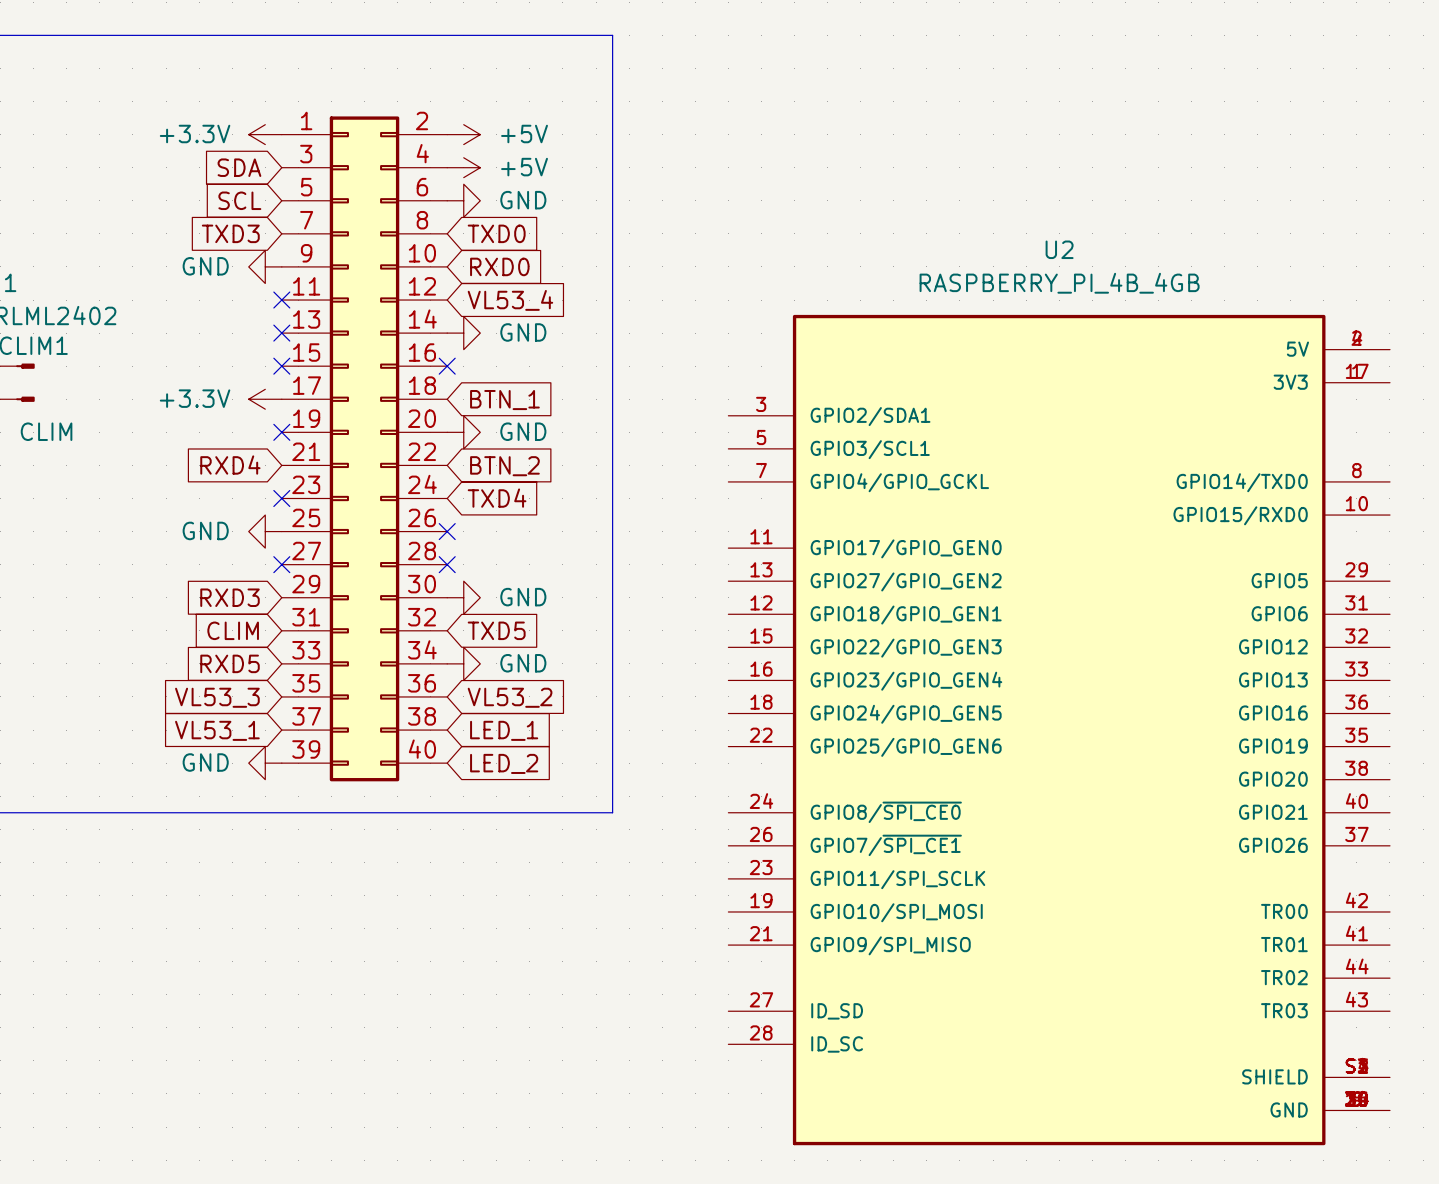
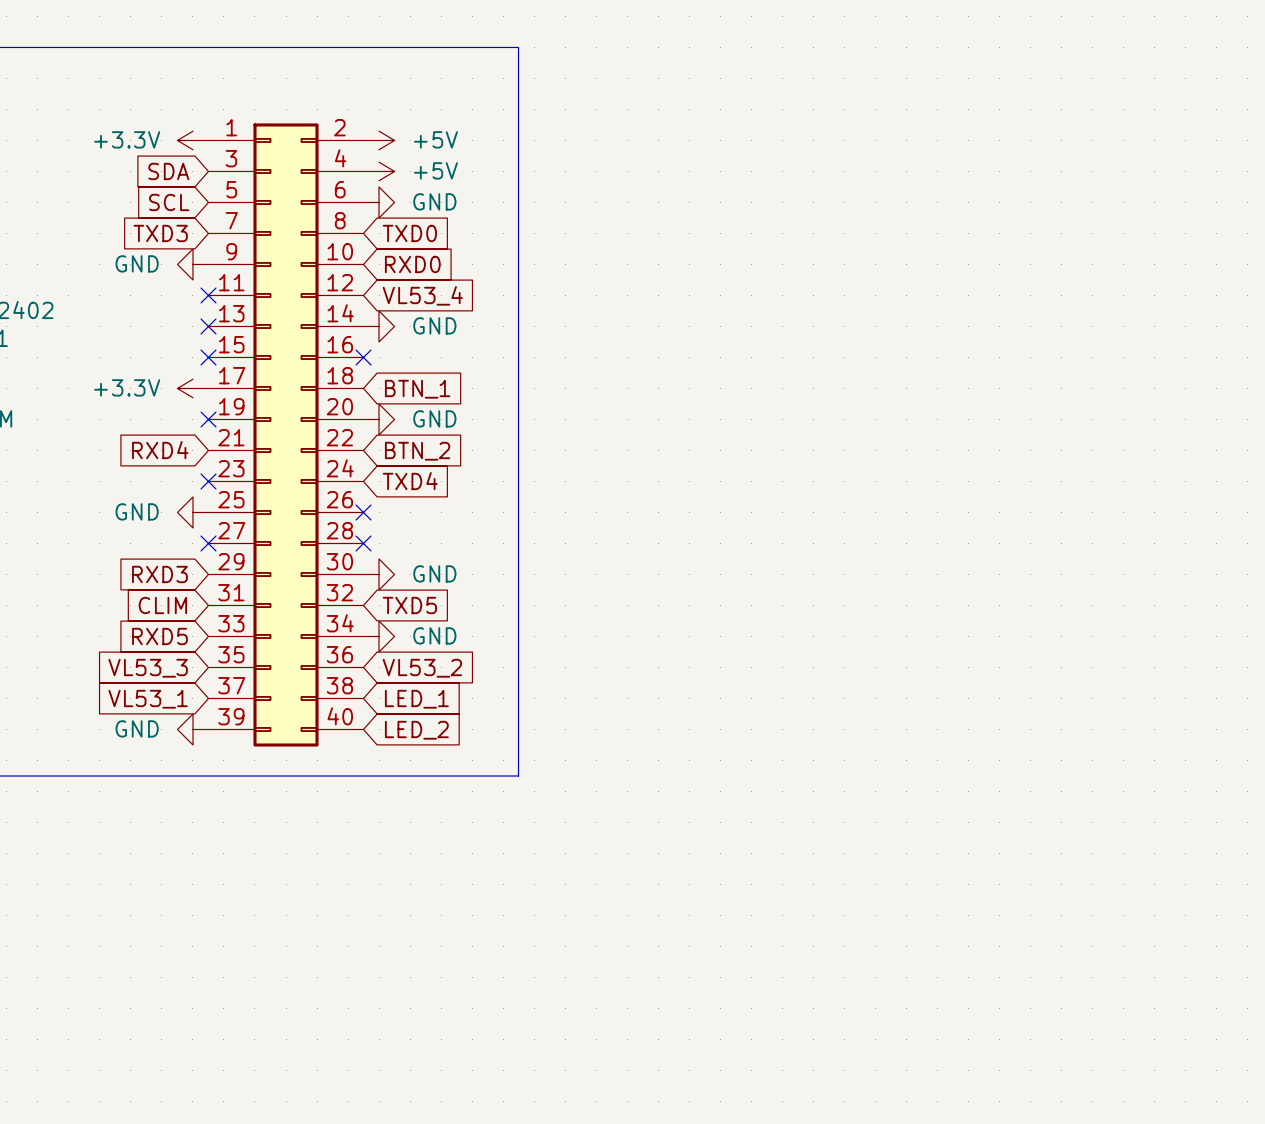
U2: RASPBERRY_PI_4B_4GB (1059, 730) -> none

